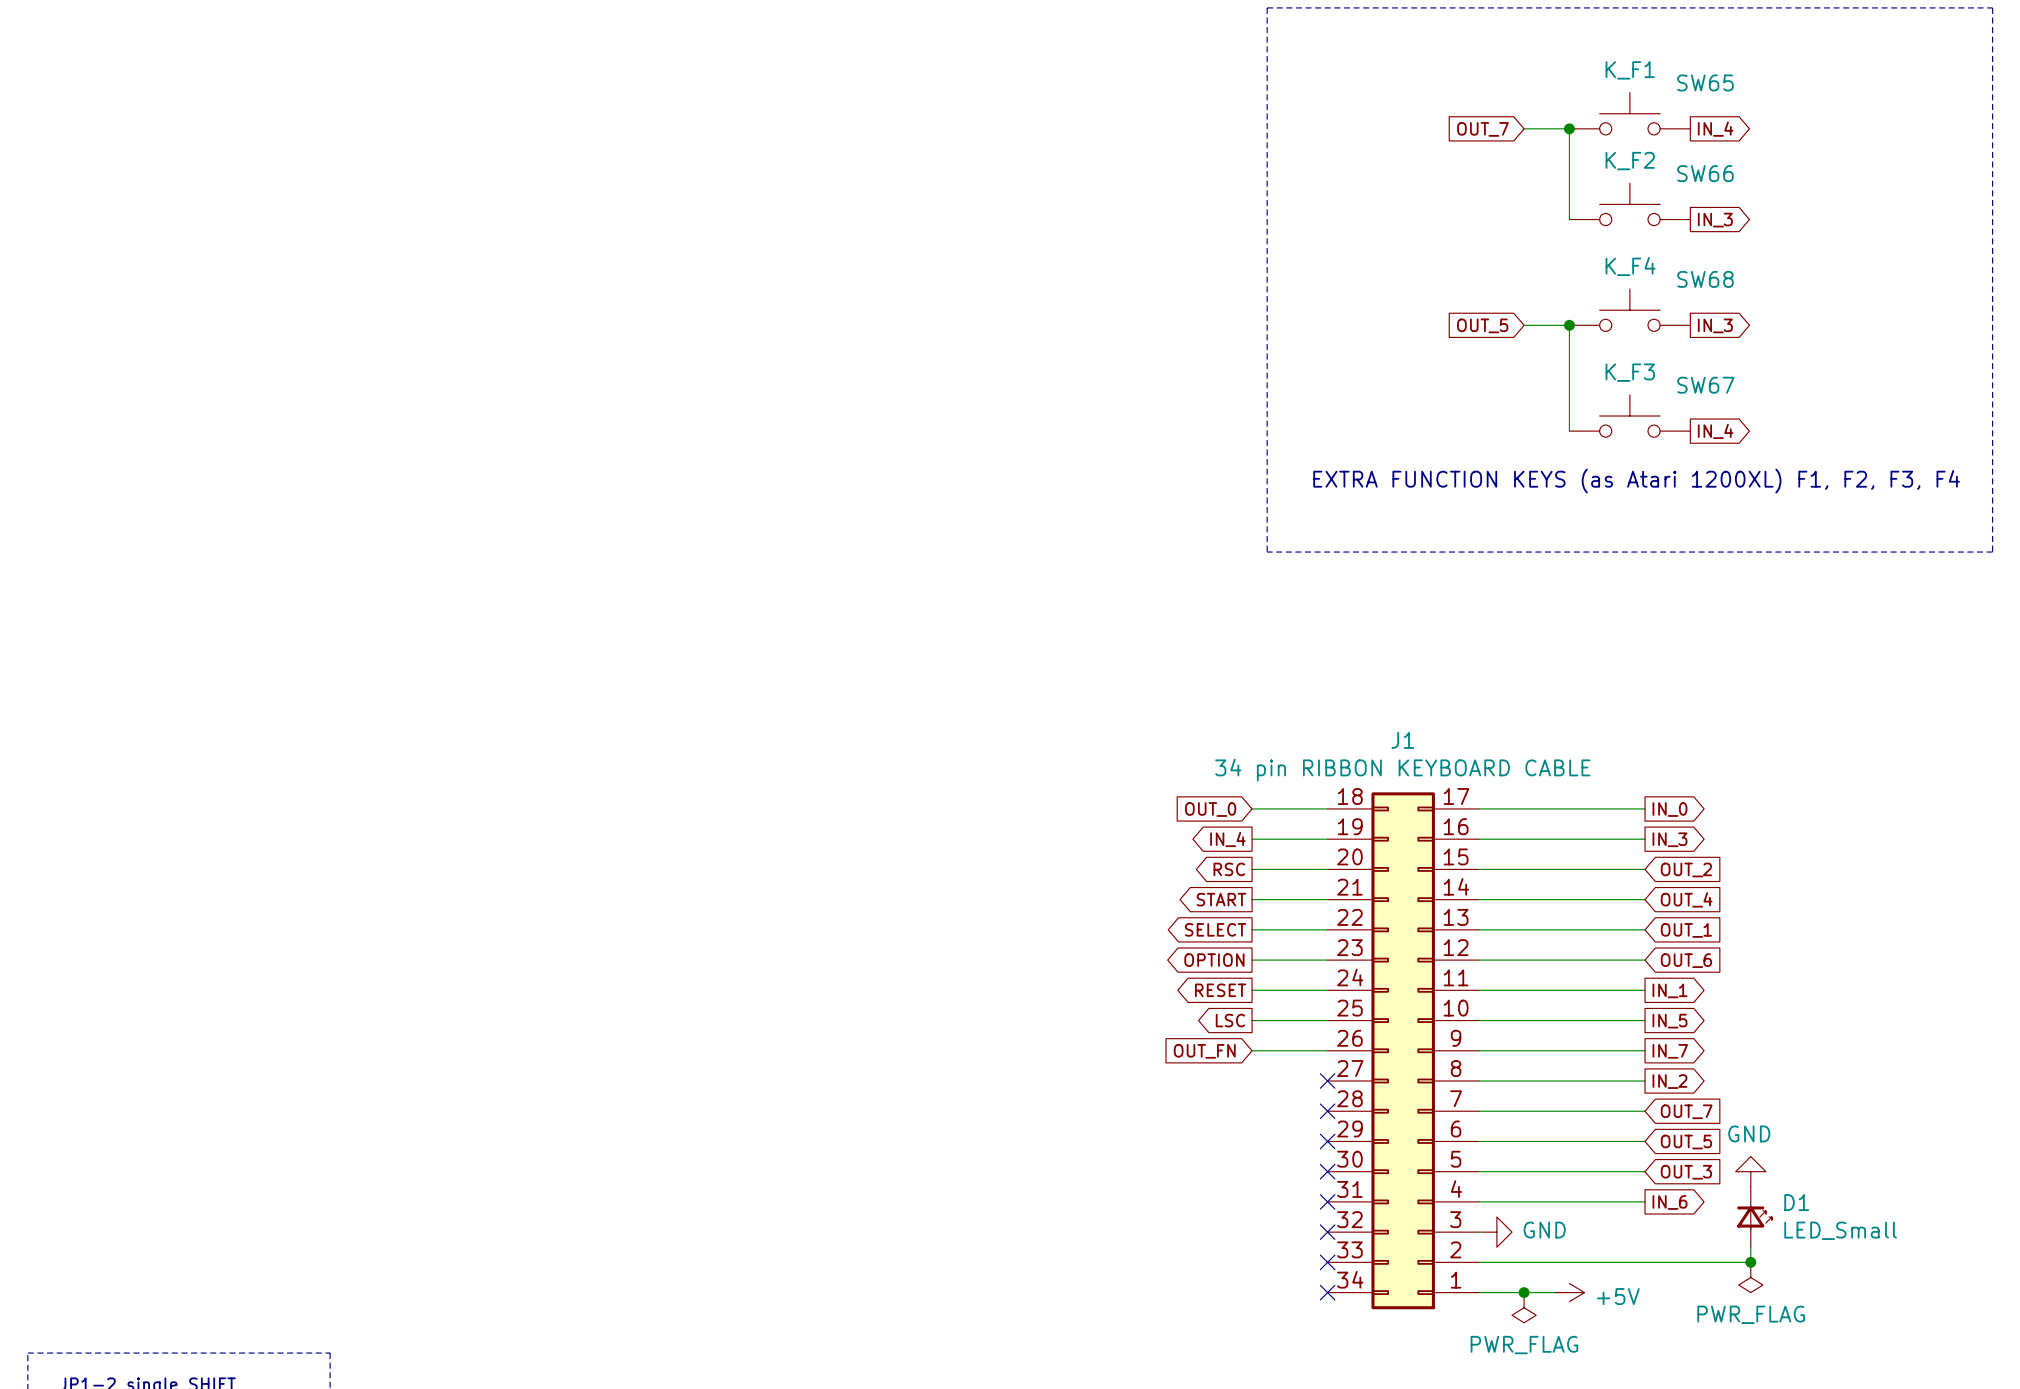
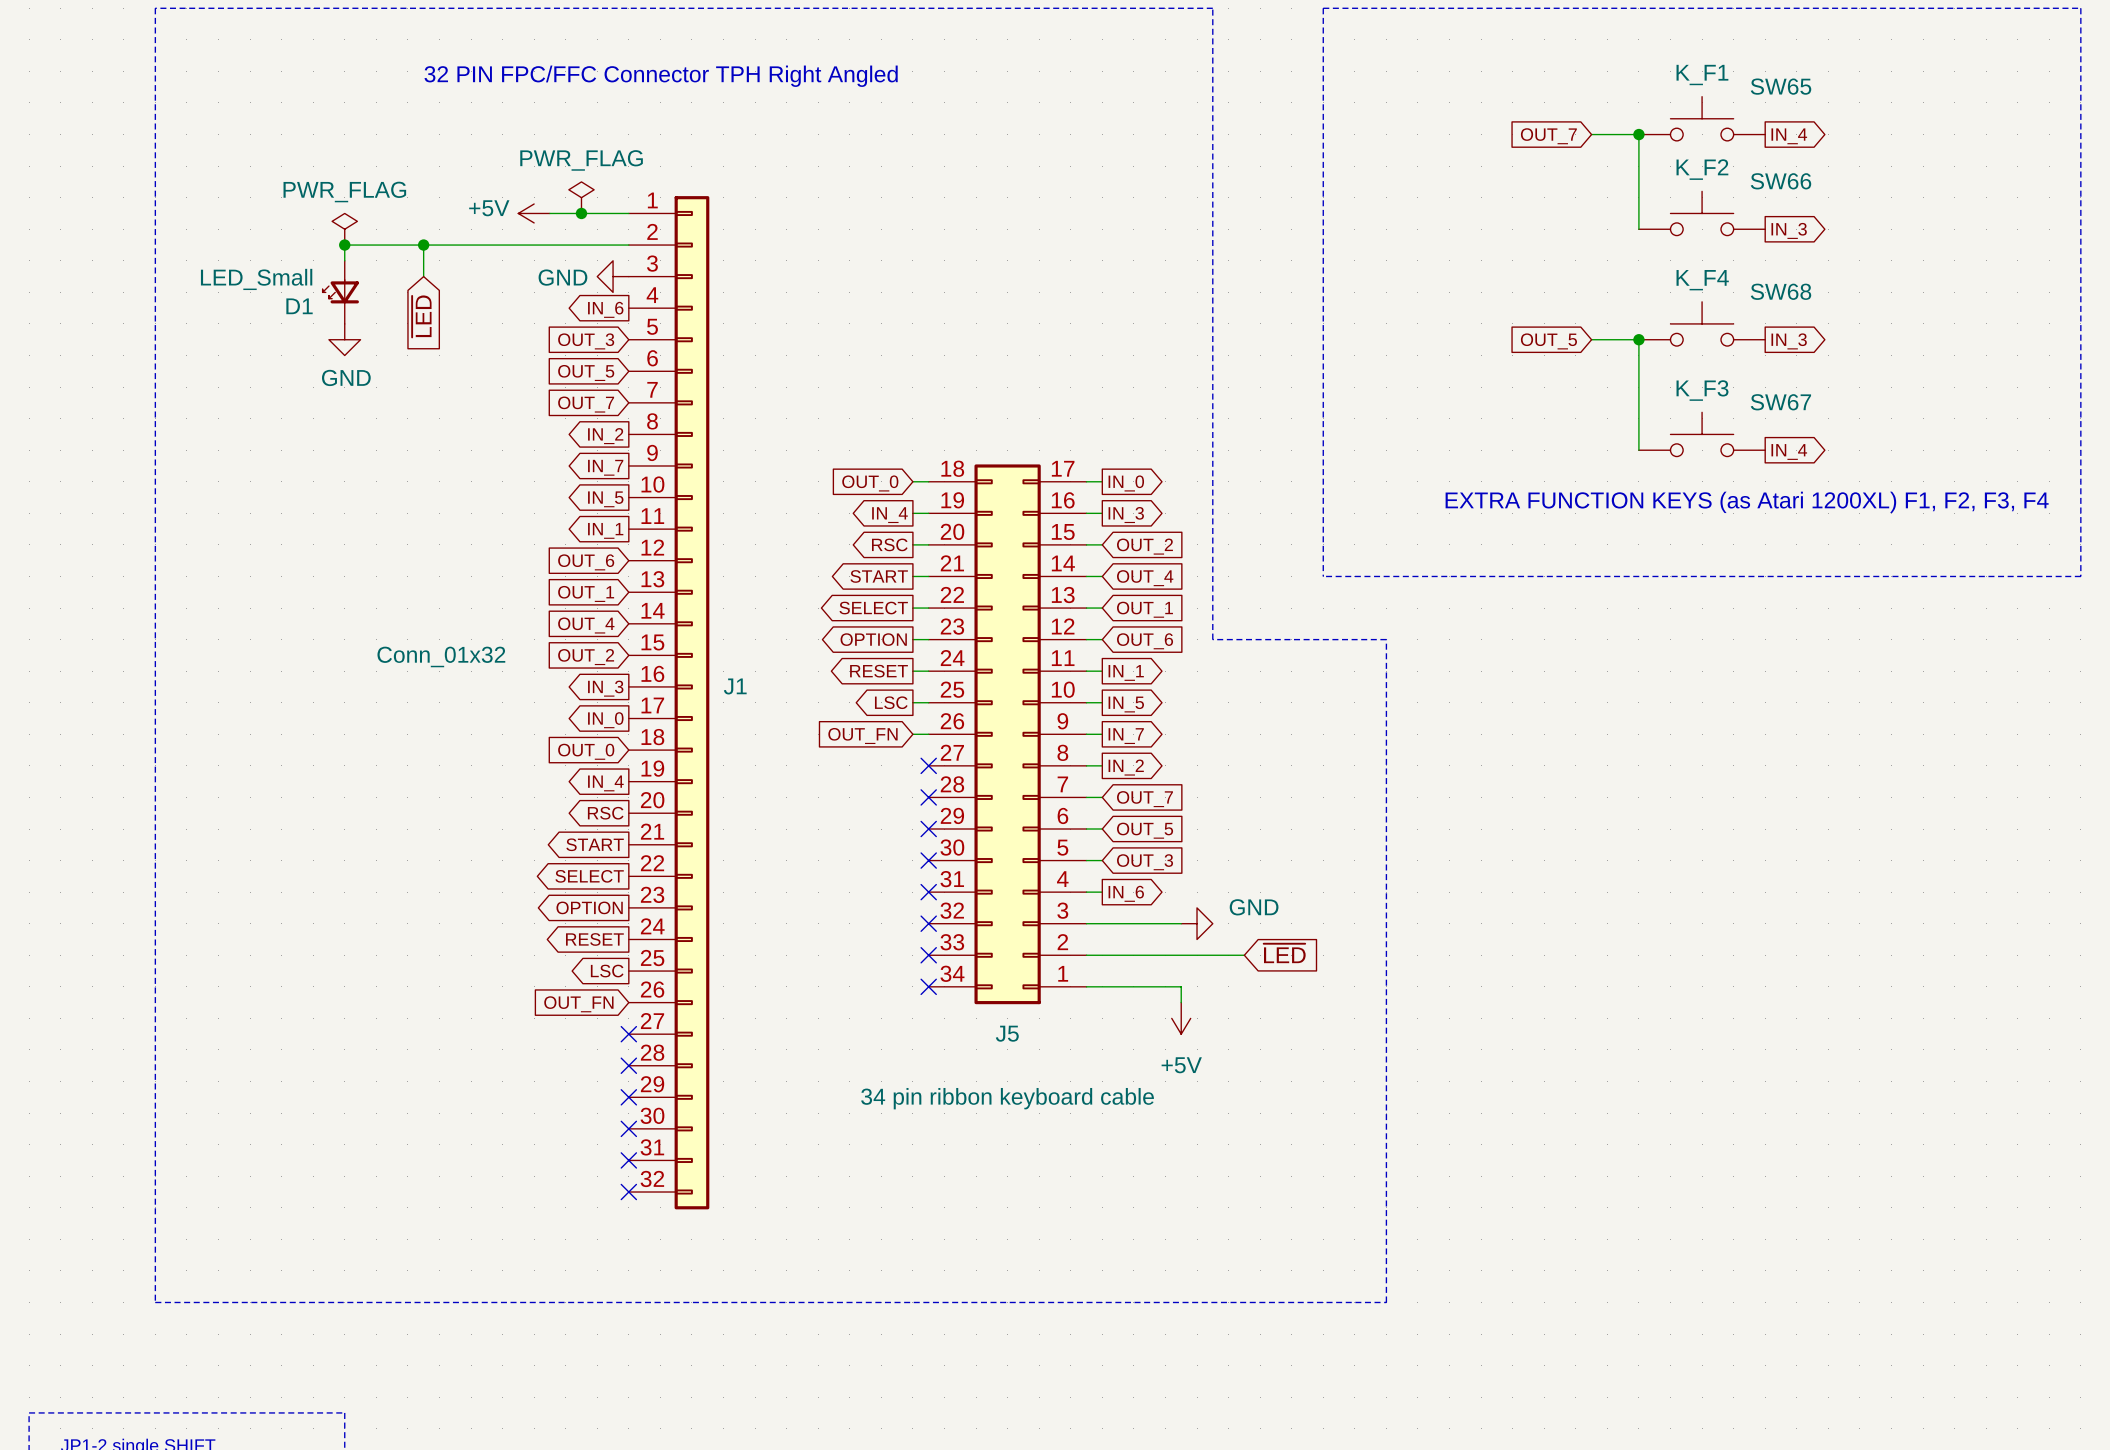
line: none -> (155, 8) (1212, 8) (1212, 639) (1386, 639) (1386, 1302) (155, 1302) (155, 8)
text: none -> 32 PIN FPC/FFC Connector TPH Right Angled (661, 76)
power symbol: none -> PWR_FLAG (581, 197)
power symbol: none -> +5V (534, 213)
wire: none -> (549, 213) (628, 213)
junction: none -> (581, 213)
power symbol: none -> PWR_FLAG (344, 229)
junction: none -> (344, 245)
wire: none -> (423, 245) (423, 276)
junction: none -> (423, 245)
wire: none -> (628, 245) (344, 245) (344, 260)
power symbol: none -> GND (613, 276)
global label: none -> IN_6 (605, 309)
global label: none -> ~{LED} (421, 316)
power symbol: none -> GND (344, 339)
global label: none -> OUT_3 (586, 341)
global label: none -> OUT_5 (586, 372)
global label: none -> OUT_7 (586, 404)
global label: none -> IN_2 (605, 436)
global label: none -> IN_7 (605, 467)
global label: none -> OUT_0 (870, 483)
wire: none -> (912, 481) (928, 481)
wire: none -> (1086, 481) (1102, 481)
global label: none -> IN_0 (1126, 483)
global label: none -> IN_5 (605, 499)
global label: none -> IN_4 (889, 515)
wire: none -> (912, 513) (928, 513)
wire: none -> (1086, 513) (1102, 513)
global label: none -> IN_3 (1126, 515)
global label: none -> IN_1 (605, 530)
global label: none -> RSC (889, 544)
wire: none -> (912, 544) (928, 544)
wire: none -> (1086, 544) (1102, 544)
global label: none -> OUT_2 (1144, 546)
global label: none -> OUT_6 (586, 562)
global label: none -> START (879, 576)
wire: none -> (912, 576) (928, 576)
wire: none -> (1086, 576) (1102, 576)
global label: none -> OUT_4 (1145, 578)
global label: none -> OUT_1 (586, 593)
global label: none -> SELECT (873, 608)
wire: none -> (912, 608) (928, 608)
wire: none -> (1086, 608) (1102, 608)
global label: none -> OUT_1 (1144, 609)
global label: none -> OUT_4 (586, 625)
global label: none -> OPTION (873, 639)
wire: none -> (912, 639) (928, 639)
wire: none -> (1086, 639) (1102, 639)
global label: none -> OUT_6 (1145, 641)
global label: none -> OUT_2 (586, 657)
global label: none -> RESET (879, 671)
wire: none -> (912, 671) (928, 671)
wire: none -> (1086, 671) (1102, 671)
global label: none -> IN_1 (1126, 672)
global label: none -> IN_3 (605, 688)
global label: none -> LSC (891, 702)
wire: none -> (912, 702) (928, 702)
wire: none -> (1086, 702) (1102, 702)
global label: none -> IN_5 (1126, 704)
global label: none -> IN_0 (605, 720)
global label: none -> OUT_FN (862, 735)
wire: none -> (912, 734) (928, 734)
J5: none -> 34 pin ribbon keyboard cable (1007, 734)
wire: none -> (1086, 734) (1102, 734)
global label: none -> IN_7 (1126, 736)
global label: none -> OUT_0 (586, 751)
no-connect mark: none -> (928, 765)
wire: none -> (1086, 765) (1102, 765)
global label: none -> IN_2 (1126, 767)
J1 name position: J1 (1402, 740) -> J1 (735, 686)
global label: none -> IN_4 (605, 783)
no-connect mark: none -> (928, 797)
wire: none -> (1086, 797) (1102, 797)
global label: none -> OUT_7 (1144, 799)
J1 value: 34 pin RIBBON KEYBOARD CABLE (1402, 770) -> Conn_01x32 (441, 656)
global label: none -> RSC (605, 813)
J1 symbol: [1327, 792, 1479, 1310] -> [628, 196, 710, 1210]
no-connect mark: none -> (928, 829)
wire: none -> (1086, 829) (1102, 829)
global label: none -> OUT_5 (1145, 830)
global label: none -> START (595, 844)
wire: (1252, 808) (1327, 808) -> none
wire: (1478, 808) (1645, 808) -> none
global label: OUT_0 (1210, 809) -> none
global label: IN_0 (1669, 809) -> none
no-connect mark: none -> (928, 860)
wire: none -> (1086, 860) (1102, 860)
global label: none -> OUT_3 (1145, 862)
global label: none -> SELECT (589, 876)
global label: IN_4 (1227, 839) -> none
wire: (1252, 839) (1327, 839) -> none
wire: (1478, 839) (1645, 839) -> none
global label: IN_3 (1669, 839) -> none
no-connect mark: none -> (928, 892)
wire: none -> (1086, 892) (1102, 892)
global label: none -> IN_6 (1126, 893)
global label: none -> OPTION (589, 907)
global label: RSC (1229, 869) -> none
wire: (1252, 869) (1327, 869) -> none
wire: (1478, 869) (1645, 869) -> none
global label: OUT_2 (1686, 869) -> none
no-connect mark: none -> (928, 923)
wire: none -> (1086, 923) (1181, 923)
power symbol: none -> GND (1197, 923)
global label: none -> RESET (594, 939)
global label: START (1221, 899) -> none
wire: (1252, 899) (1327, 899) -> none
wire: (1478, 899) (1645, 899) -> none
global label: OUT_4 (1686, 899) -> none
global label: none -> ~{LED} (1284, 953)
no-connect mark: none -> (928, 955)
wire: none -> (1086, 955) (1244, 955)
global label: none -> LSC (607, 971)
global label: SELECT (1215, 929) -> none
wire: (1252, 929) (1327, 929) -> none
wire: (1478, 929) (1645, 929) -> none
global label: OUT_1 (1686, 930) -> none
no-connect mark: none -> (928, 986)
wire: none -> (1086, 986) (1181, 986) (1181, 1002)
global label: none -> OUT_FN (578, 1004)
global label: OPTION (1214, 960) -> none
wire: (1252, 960) (1327, 960) -> none
wire: (1478, 960) (1645, 960) -> none
global label: OUT_6 (1686, 960) -> none
power symbol: none -> +5V (1181, 1018)
no-connect mark: none -> (628, 1034)
global label: RESET (1220, 990) -> none
wire: (1252, 990) (1327, 990) -> none
wire: (1478, 990) (1645, 990) -> none
global label: IN_1 (1669, 990) -> none
no-connect mark: none -> (628, 1065)
global label: LSC (1230, 1020) -> none
wire: (1252, 1020) (1327, 1020) -> none
wire: (1478, 1020) (1645, 1020) -> none
global label: IN_5 (1669, 1021) -> none
no-connect mark: none -> (628, 1097)
wire: (1252, 1050) (1327, 1050) -> none
wire: (1478, 1050) (1645, 1050) -> none
global label: OUT_FN (1204, 1051) -> none
global label: IN_7 (1670, 1051) -> none
no-connect mark: none -> (628, 1128)
no-connect mark: (1327, 1081) -> none
wire: (1478, 1081) (1645, 1081) -> none
global label: IN_2 (1669, 1081) -> none
no-connect mark: none -> (628, 1160)
no-connect mark: (1327, 1111) -> none
wire: (1478, 1111) (1645, 1111) -> none
global label: OUT_7 (1686, 1111) -> none
no-connect mark: none -> (628, 1192)
no-connect mark: (1327, 1141) -> none
wire: (1478, 1141) (1645, 1141) -> none
global label: OUT_5 (1686, 1142) -> none
no-connect mark: (1327, 1171) -> none
wire: (1478, 1171) (1645, 1171) -> none
power symbol: GND (1750, 1171) -> none
global label: OUT_3 (1686, 1172) -> none
no-connect mark: (1327, 1201) -> none
wire: (1478, 1201) (1645, 1201) -> none
global label: IN_6 (1669, 1202) -> none
D1 rotation: 0° (1754, 1217) -> 180° (340, 291)
D1 position: (1754, 1217) -> (340, 292)
no-connect mark: (1327, 1232) -> none
wire: (1478, 1232) (1481, 1232) -> none
power symbol: GND (1496, 1232) -> none
wire: (1750, 1247) (1750, 1262) (1478, 1262) -> none
no-connect mark: (1327, 1262) -> none
junction: (1750, 1262) -> none
power symbol: PWR_FLAG (1750, 1277) -> none
no-connect mark: (1327, 1292) -> none
wire: (1478, 1292) (1554, 1292) -> none
junction: (1524, 1292) -> none
power symbol: +5V (1569, 1292) -> none
power symbol: PWR_FLAG (1524, 1307) -> none

